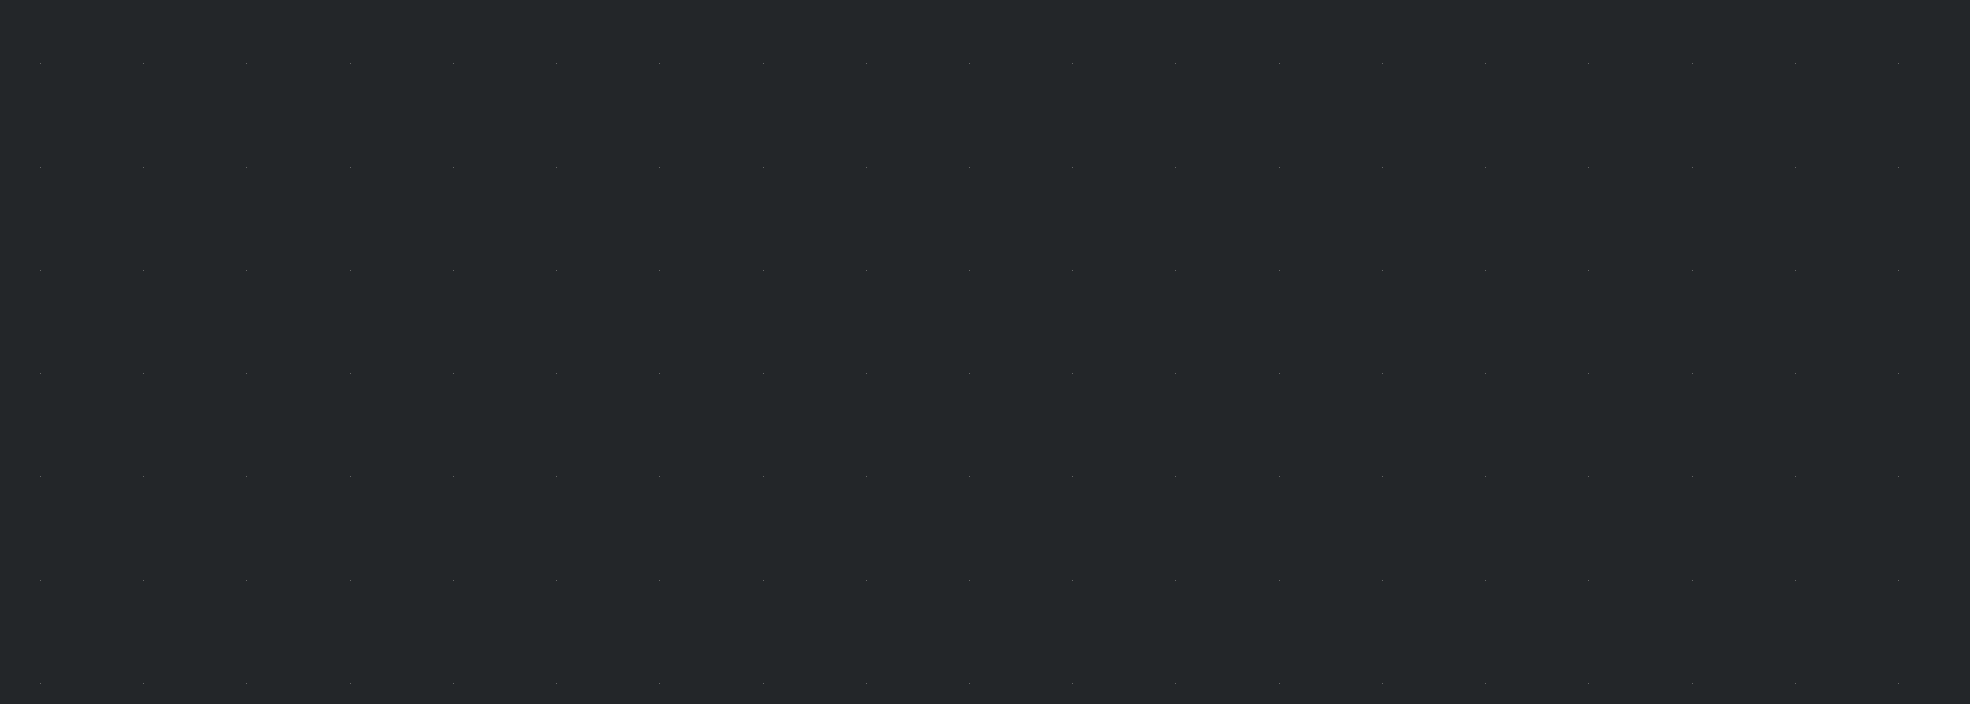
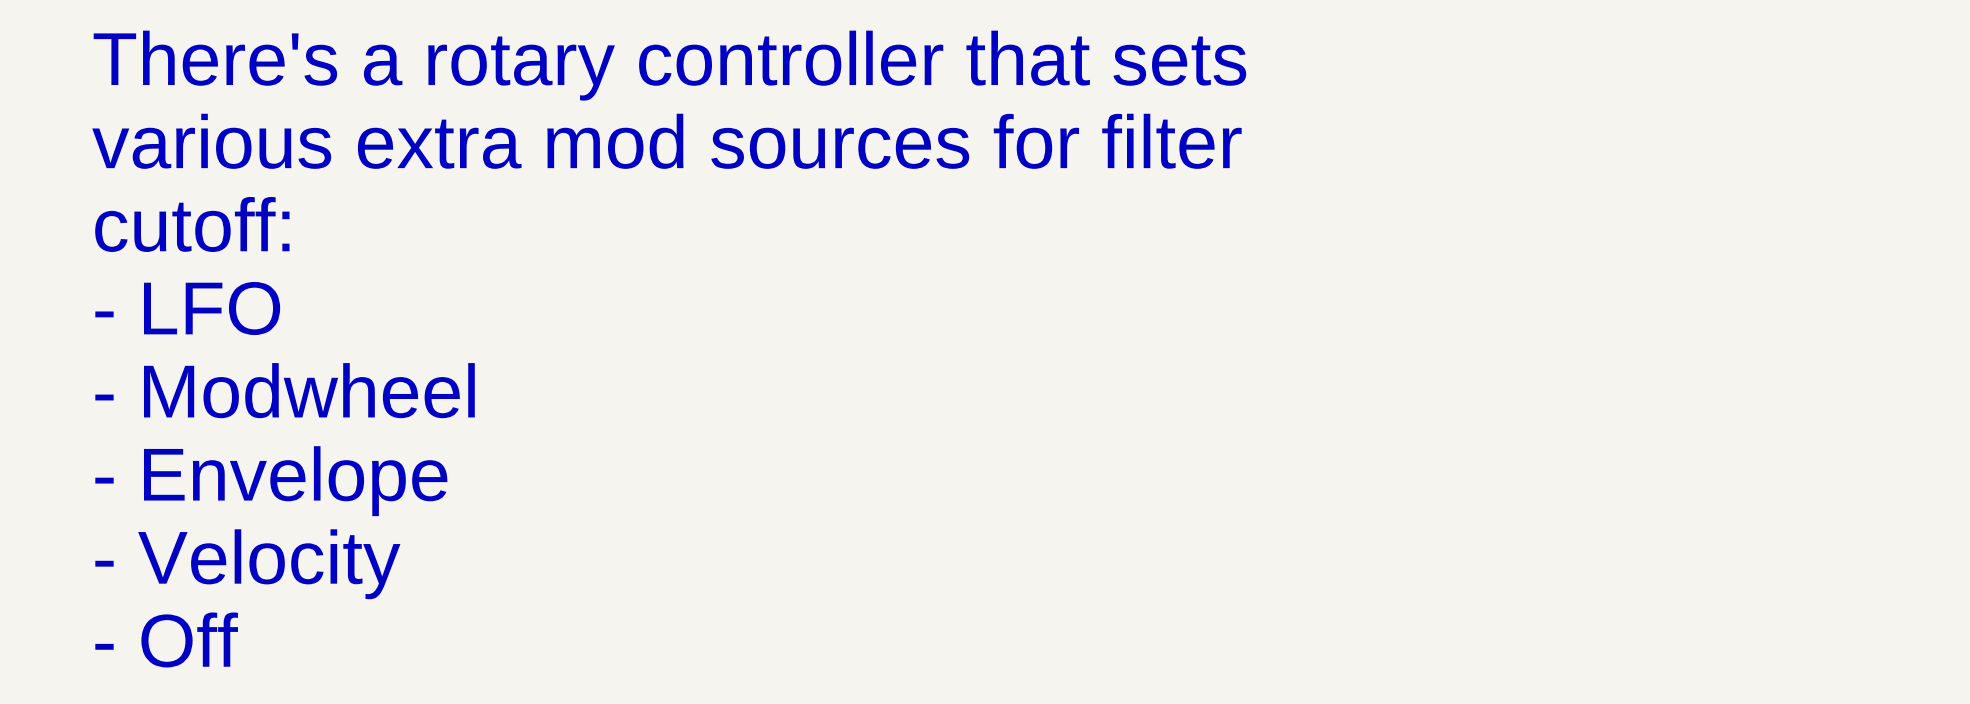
text: none -> There's a rotary controller that sets (669, 65)
text: none -> various extra mod sources for filter (666, 141)
text: none -> cutoff: (192, 224)
text: none -> - LFO (187, 308)
text: none -> - Modwheel (285, 390)
text: none -> - Envelope (271, 481)
text: none -> - Velocity (247, 564)
text: none -> - Off (166, 639)

